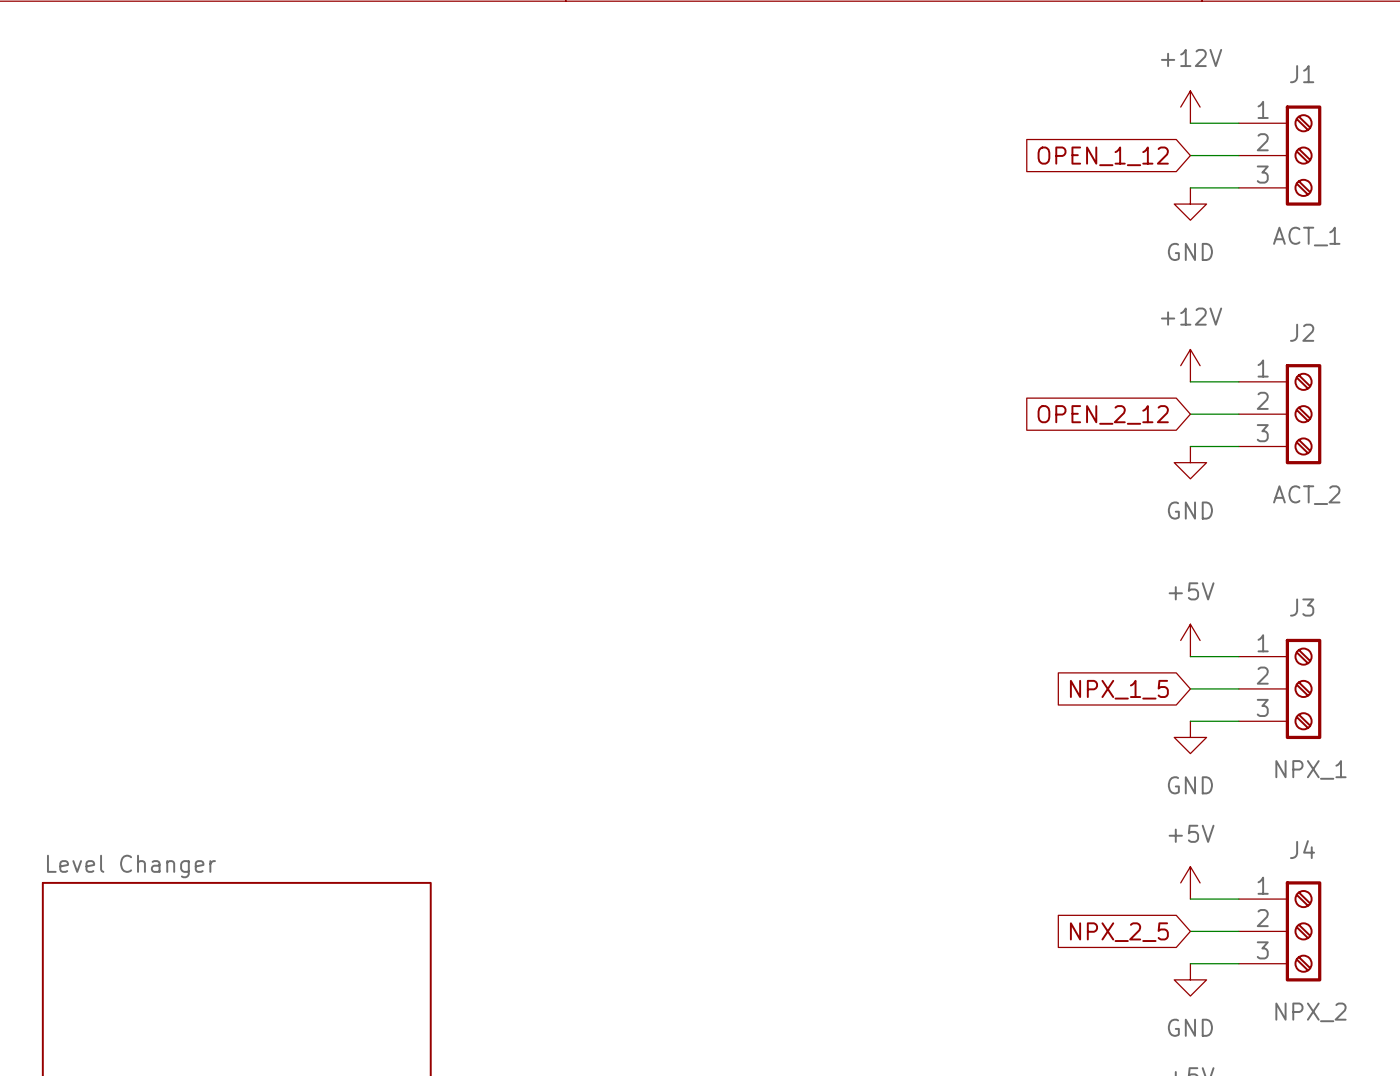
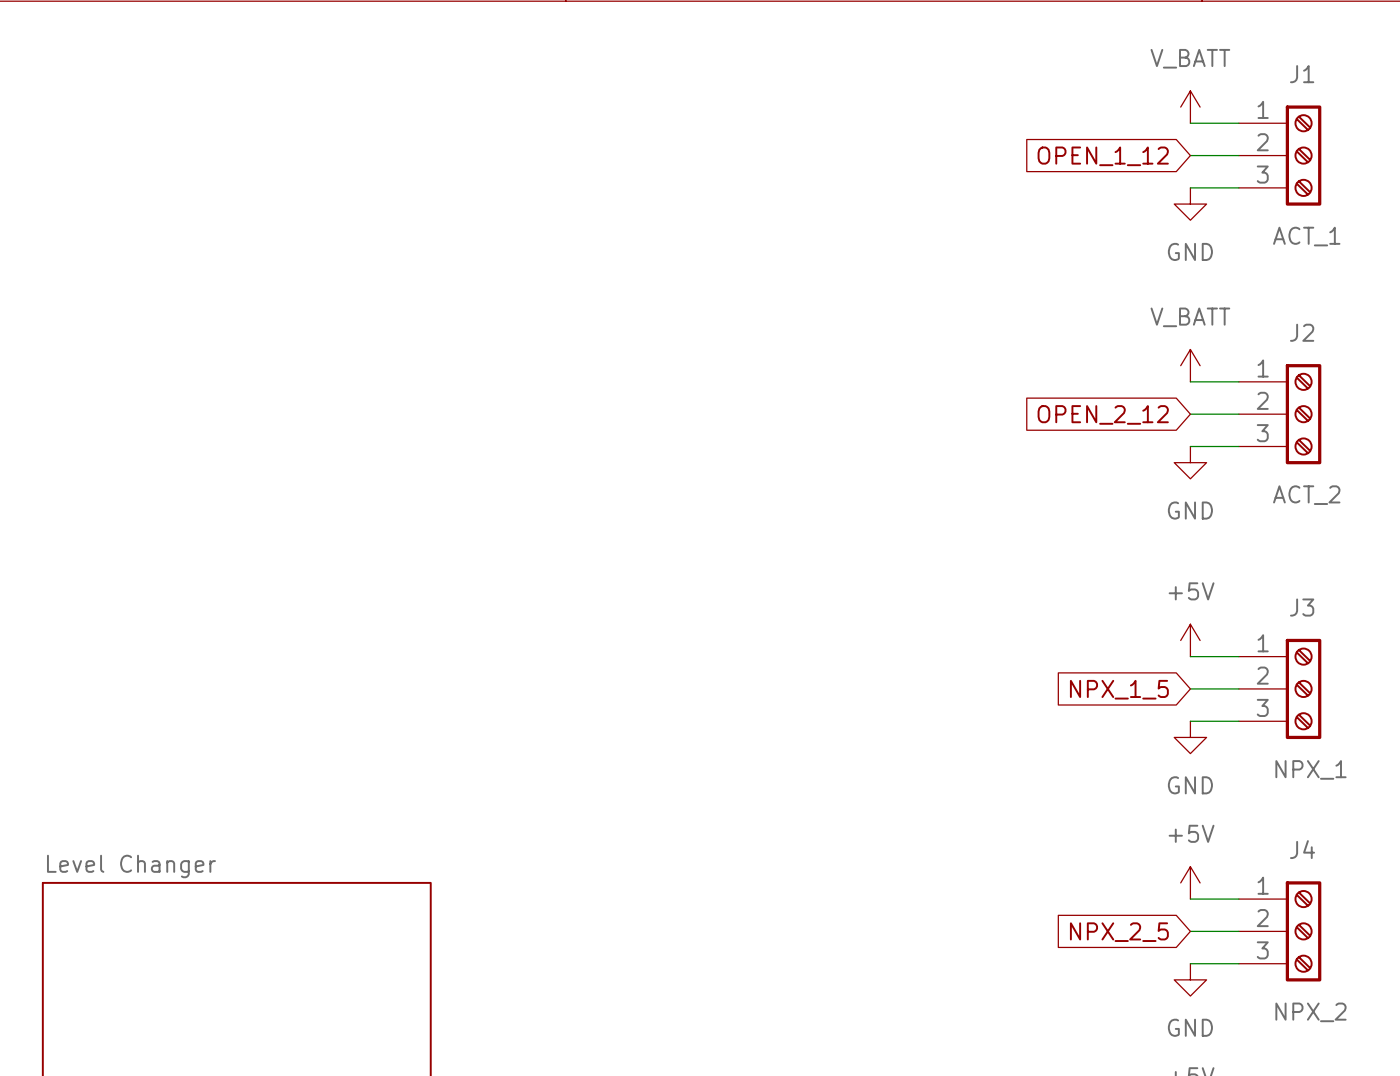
power symbol: +12V (1190, 107) -> V_BATT (1190, 107)
power symbol: +12V (1190, 365) -> V_BATT (1190, 365)

